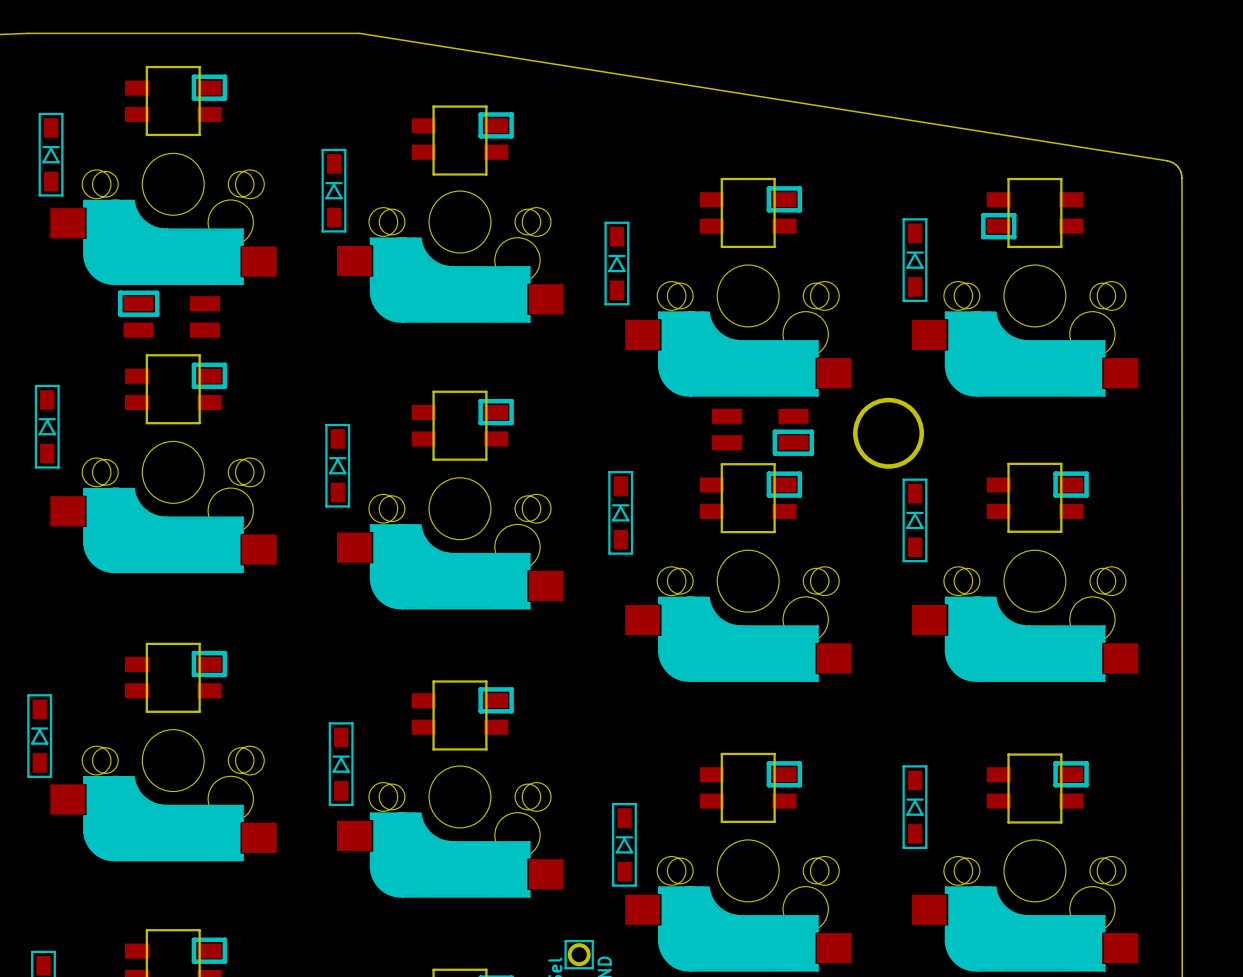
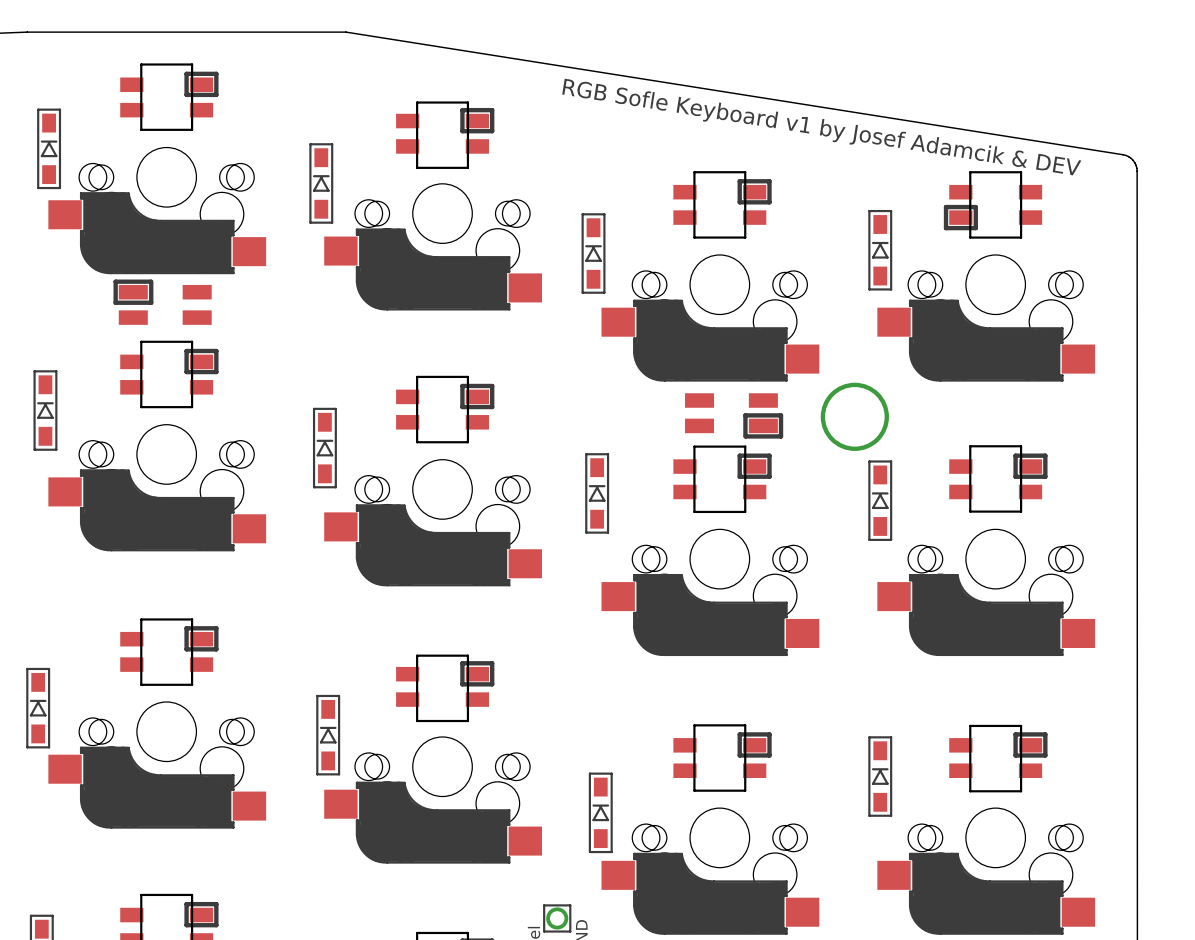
text: none -> RGB Sofle Keyboard v1 by Josef Adamcik & DEV (821, 127)

